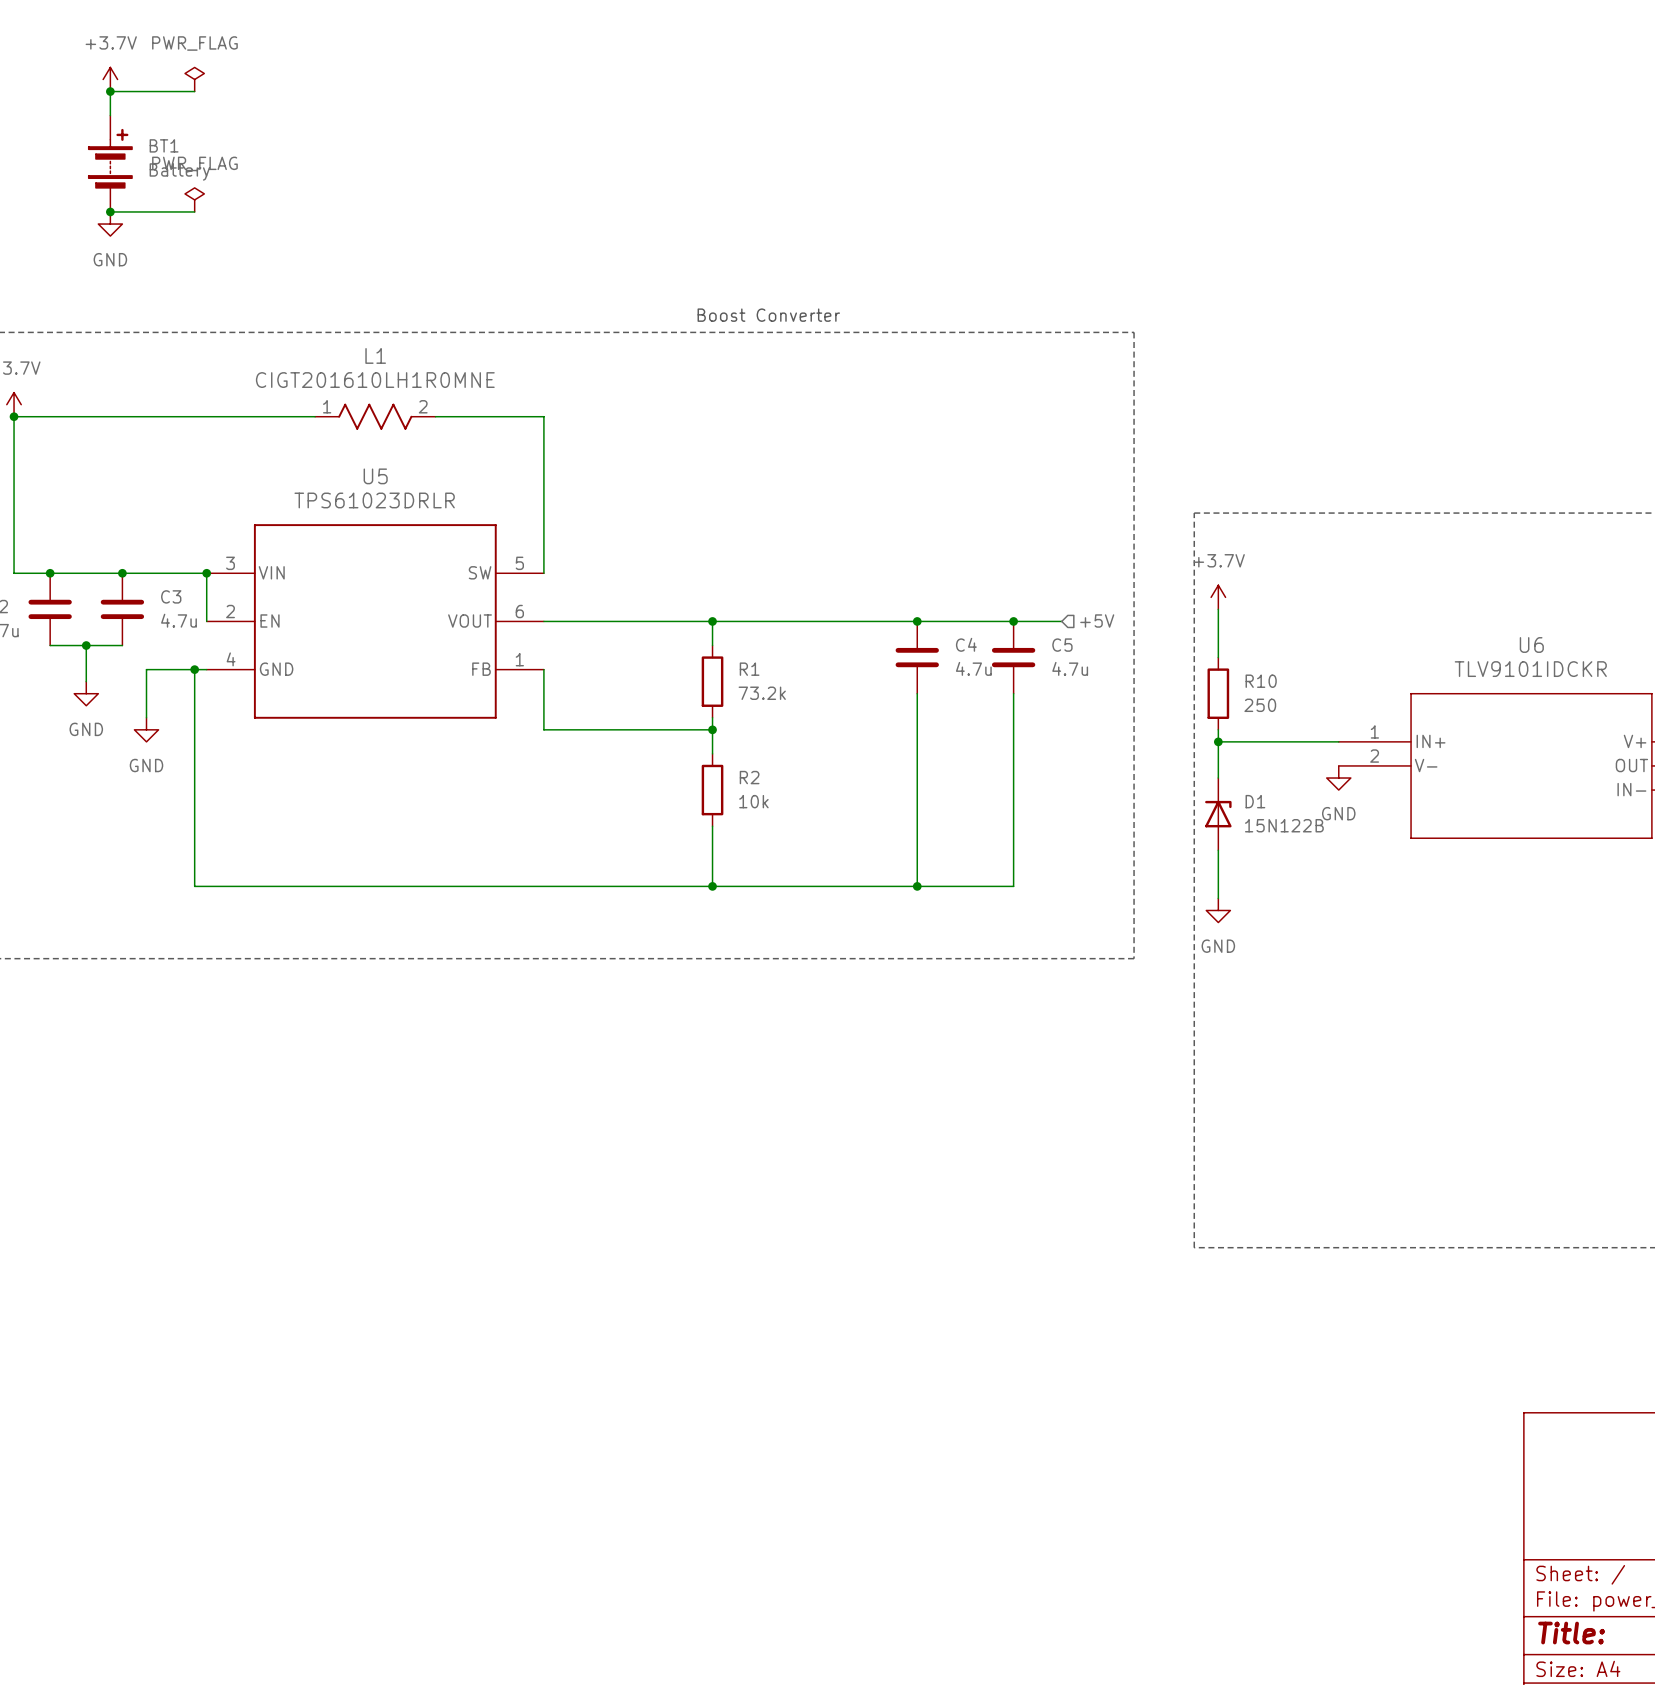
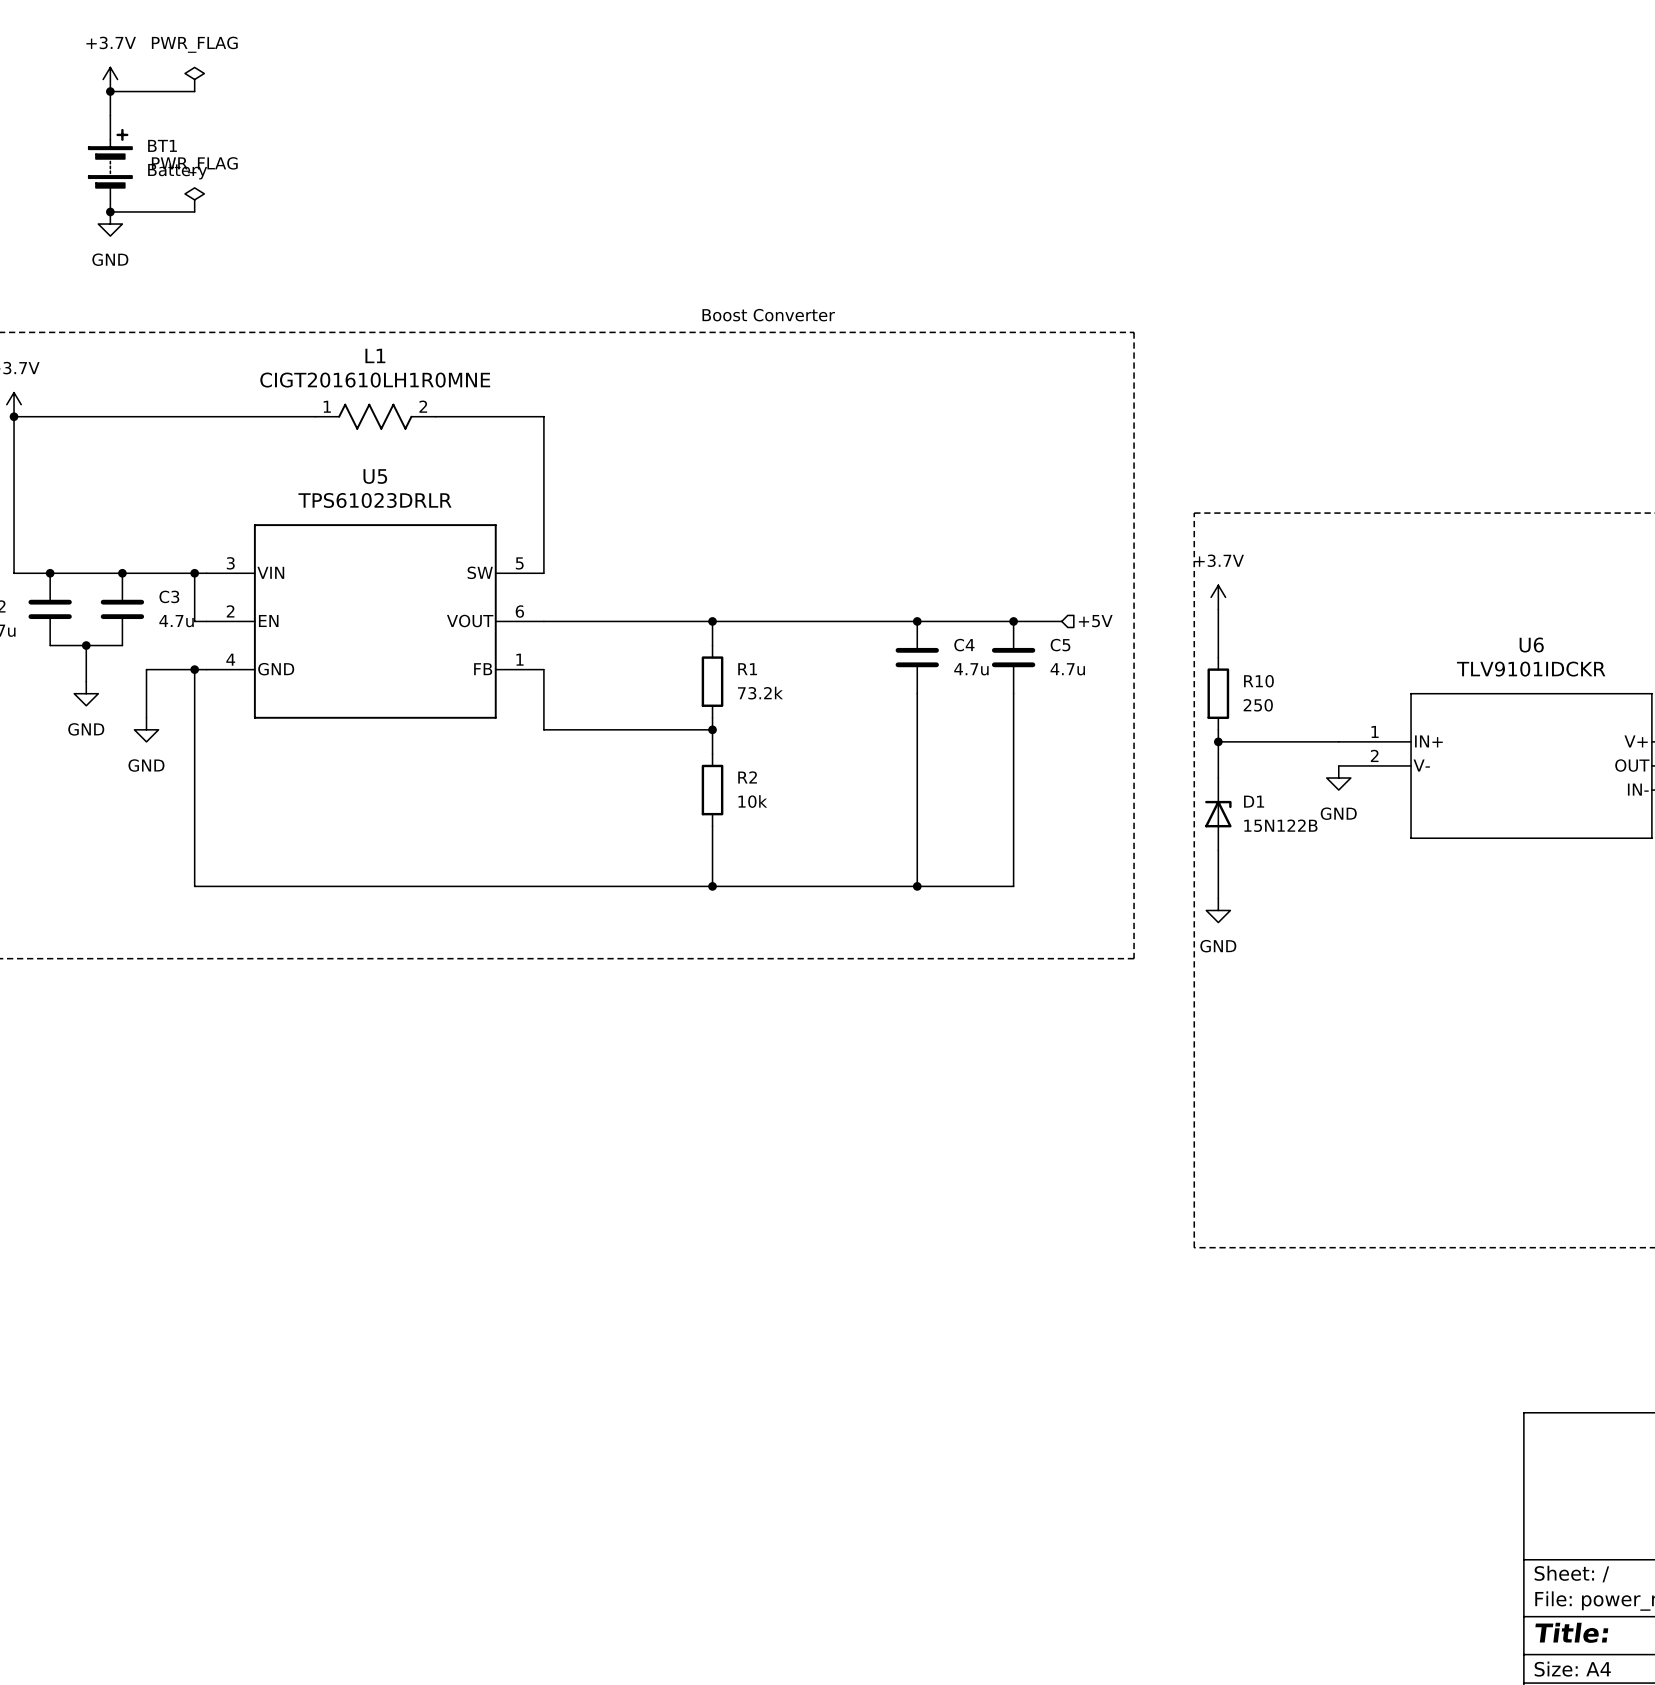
wire: (206, 573) (206, 621) -> (194, 573) (194, 621) (206, 621)
junction position: (206, 573) -> (194, 573)

